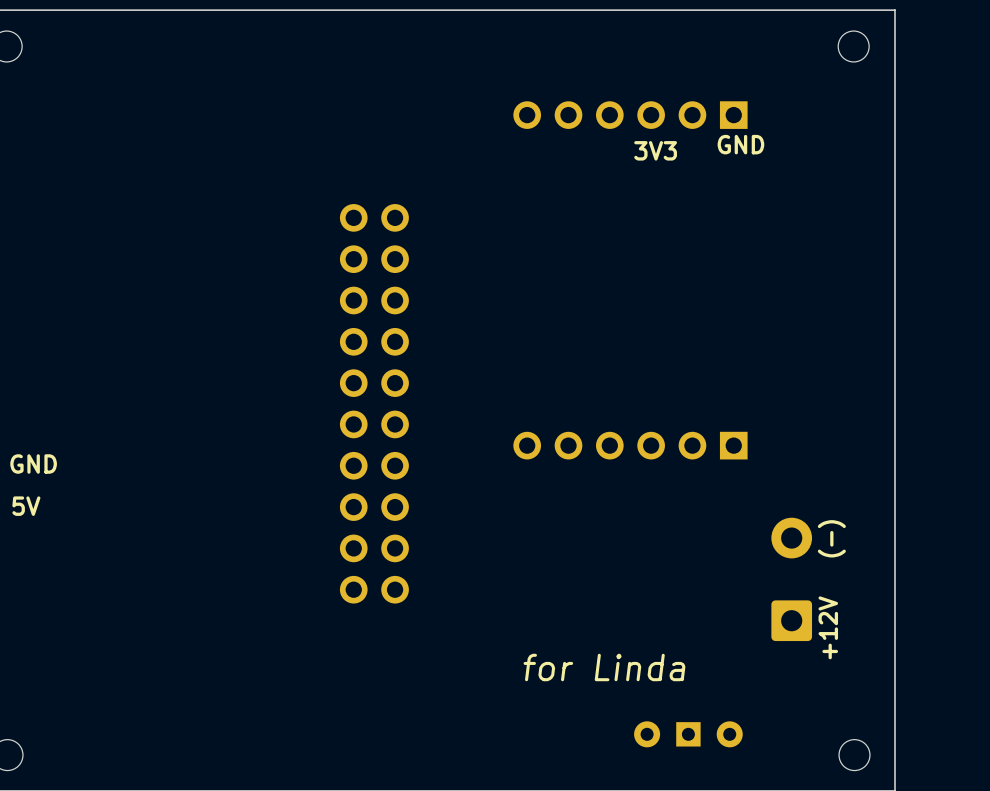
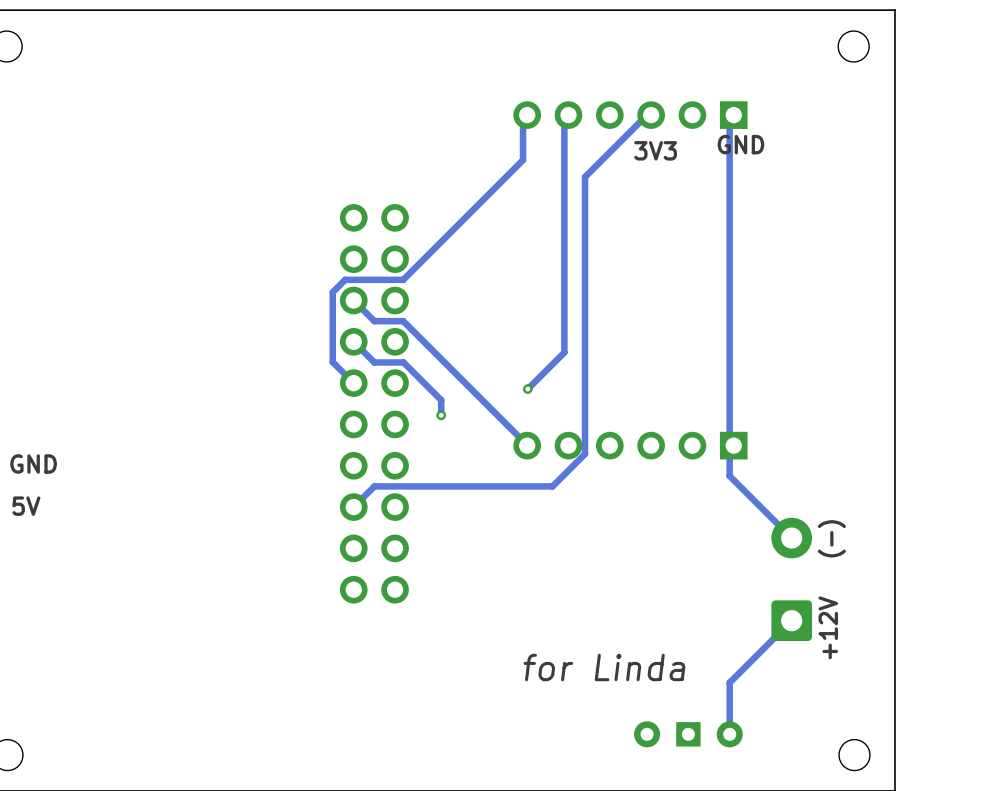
track: none -> (523, 115) (523, 160) (403, 279) (345, 279) (332, 292) (332, 362) (353, 383)
track: none -> (564, 115) (564, 352) (527, 389)
track: none -> (647, 115) (585, 177) (585, 453) (552, 486) (374, 486) (353, 507)
track: none -> (729, 115) (729, 476) (791, 538)
track: none -> (353, 300) (374, 321) (403, 321) (523, 440)
track: none -> (353, 341) (374, 362) (403, 362) (441, 400) (441, 415)
via: none -> (527, 389)
via: none -> (441, 415)
track: none -> (791, 620) (729, 682) (729, 734)

